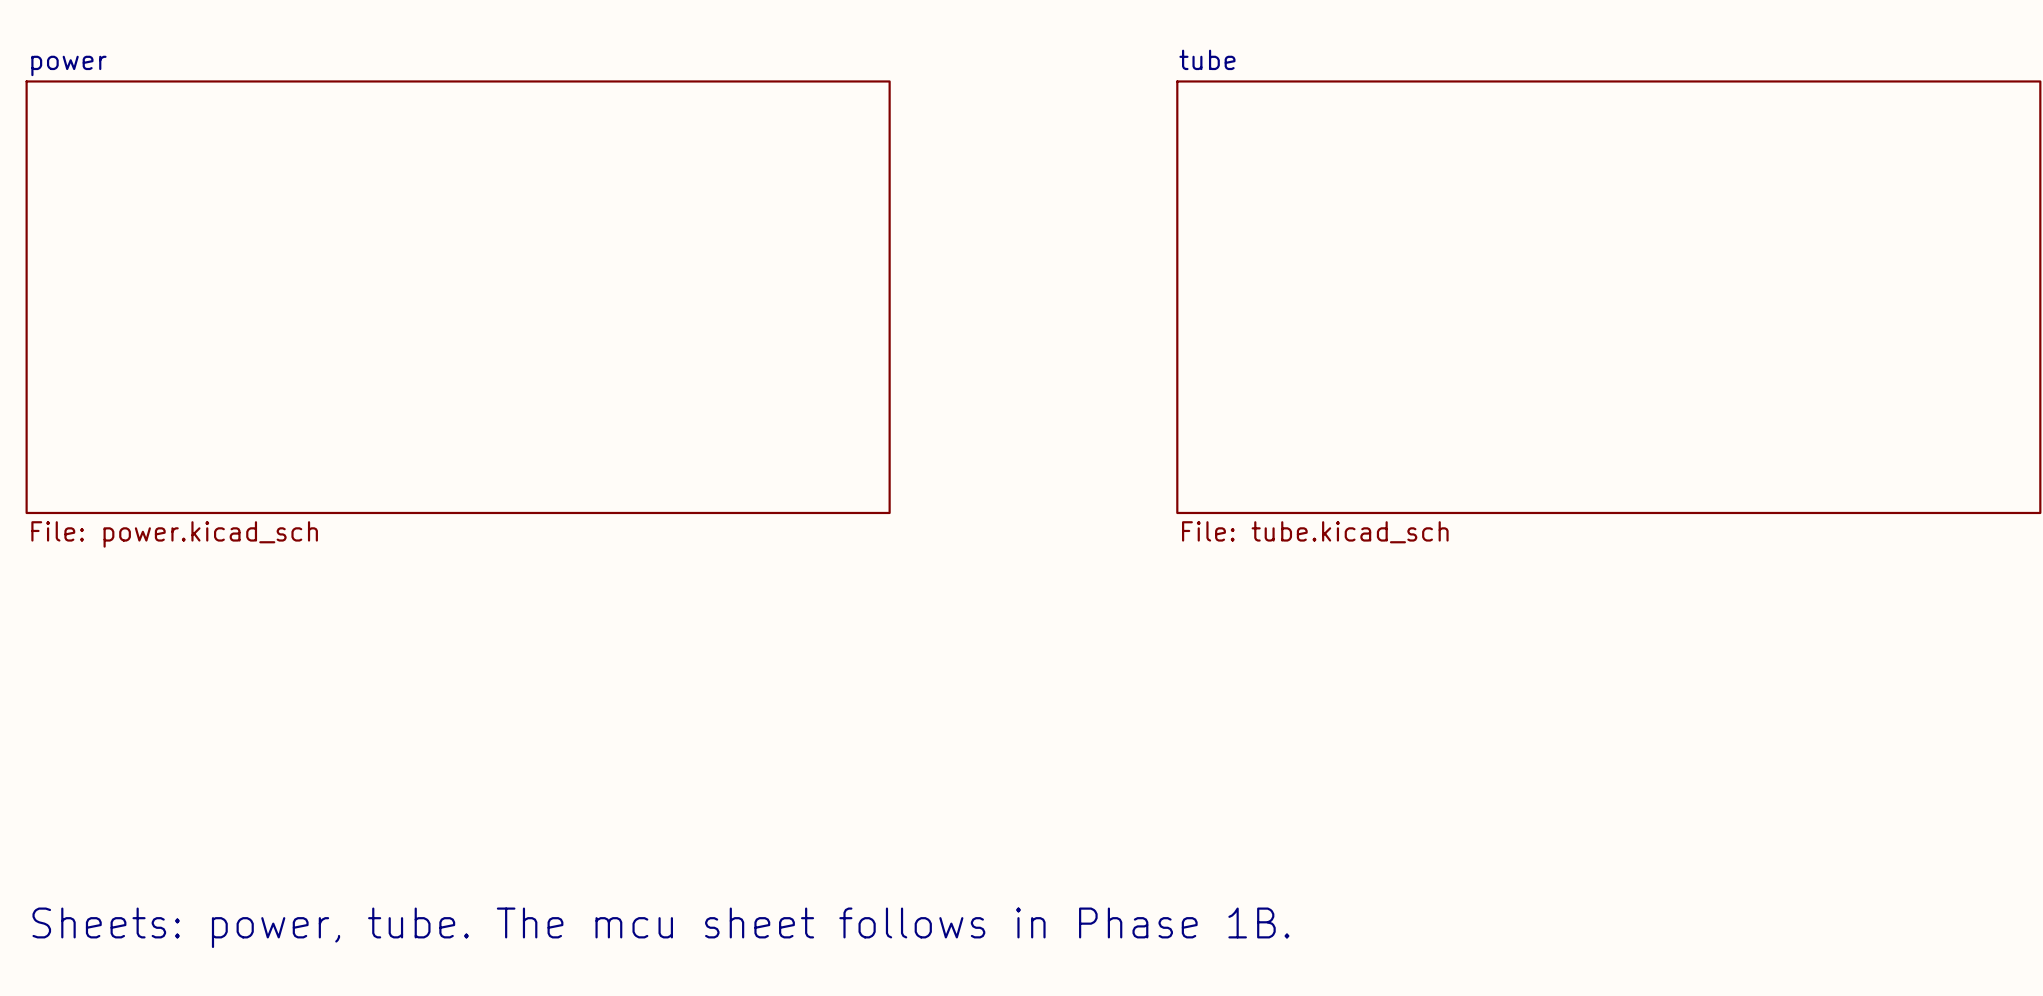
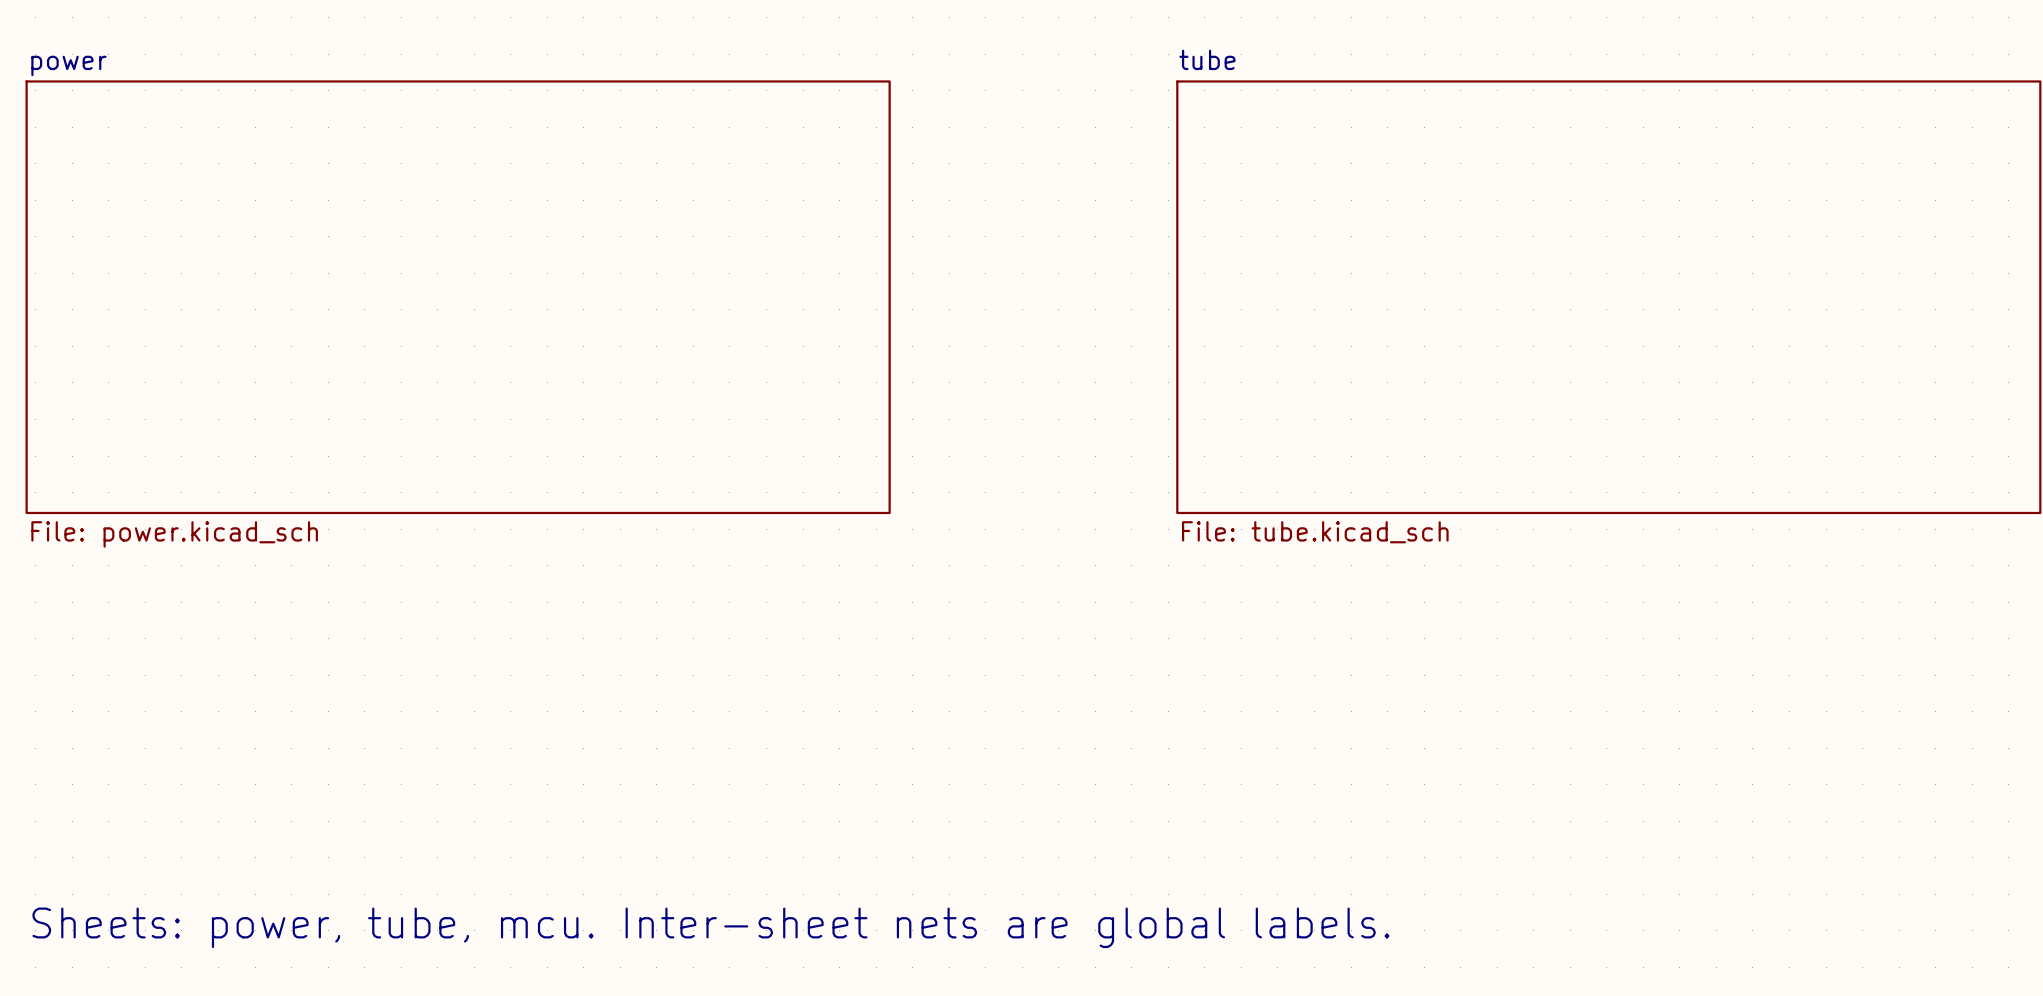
text: Sheets: power, tube. The mcu sheet follows in Phase 1B. (660, 927) -> Sheets: power, tube, mcu. Inter-sheet nets are global labels. (710, 927)

